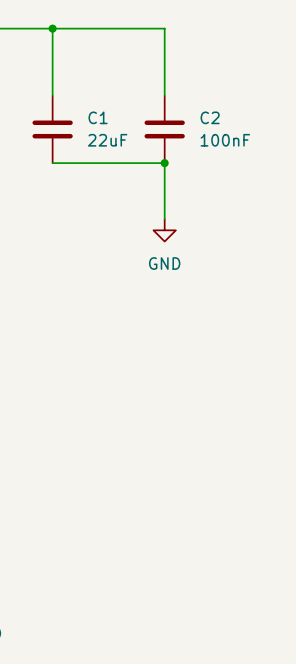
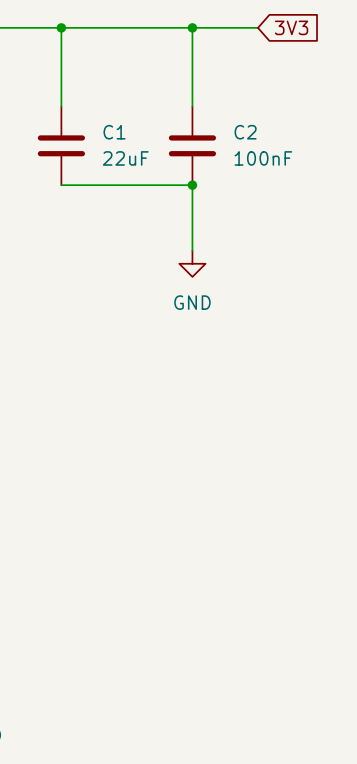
wire: none -> (192, 27) (257, 27)
junction: none -> (192, 27)
global label: none -> 3V3 (291, 27)

